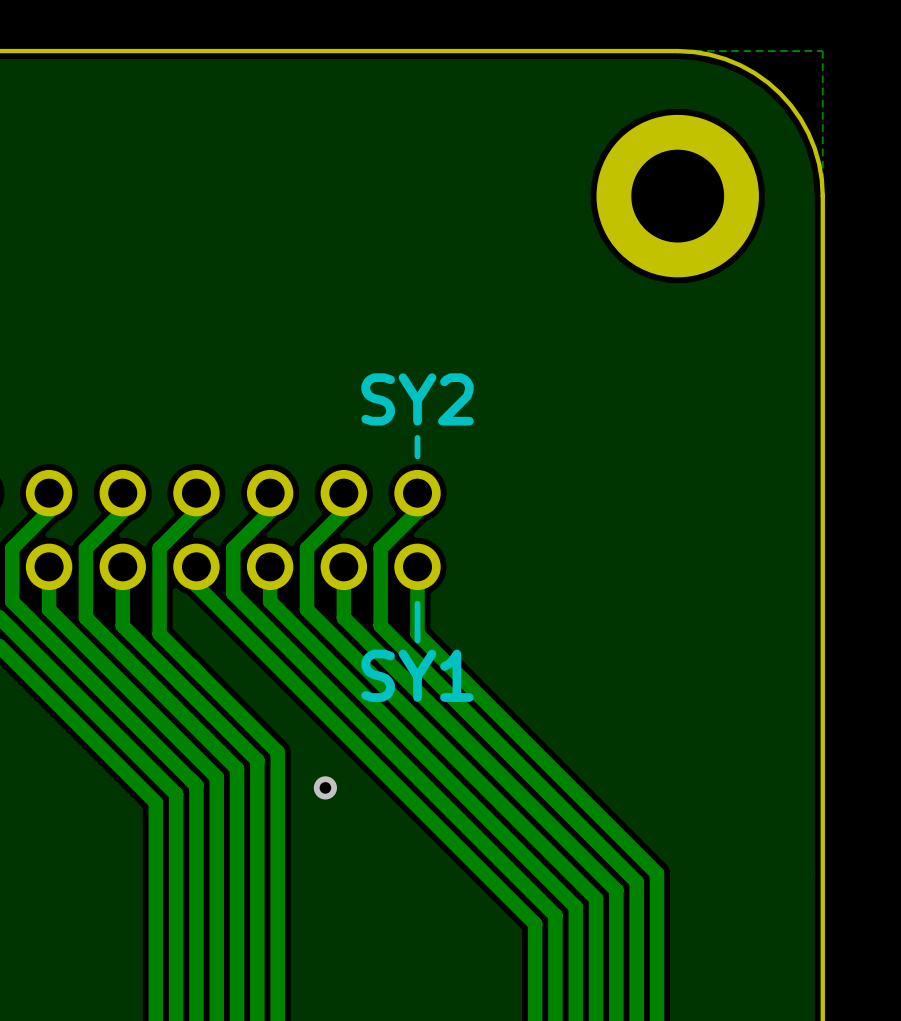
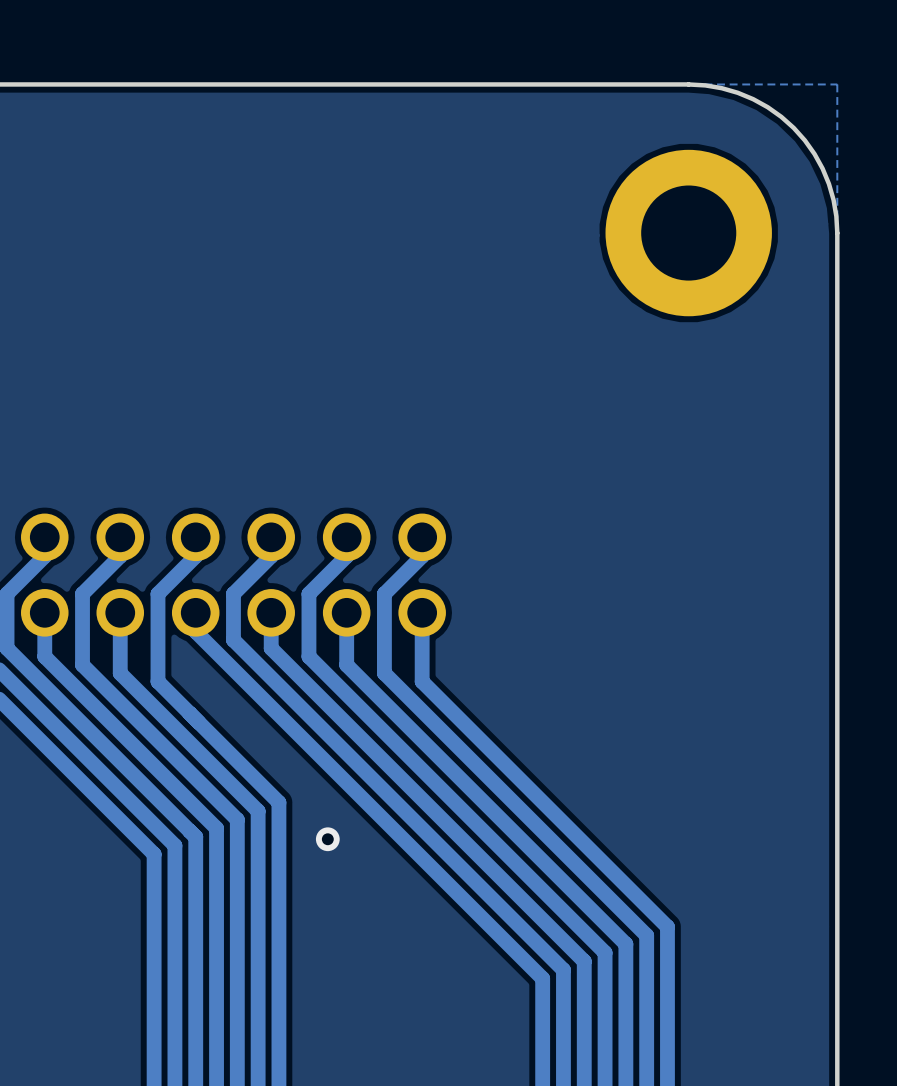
text: SY2 (417, 399) -> none
line: (417, 437) (417, 456) -> none
line: (417, 603) (417, 640) -> none
text: SY1 (417, 675) -> none

